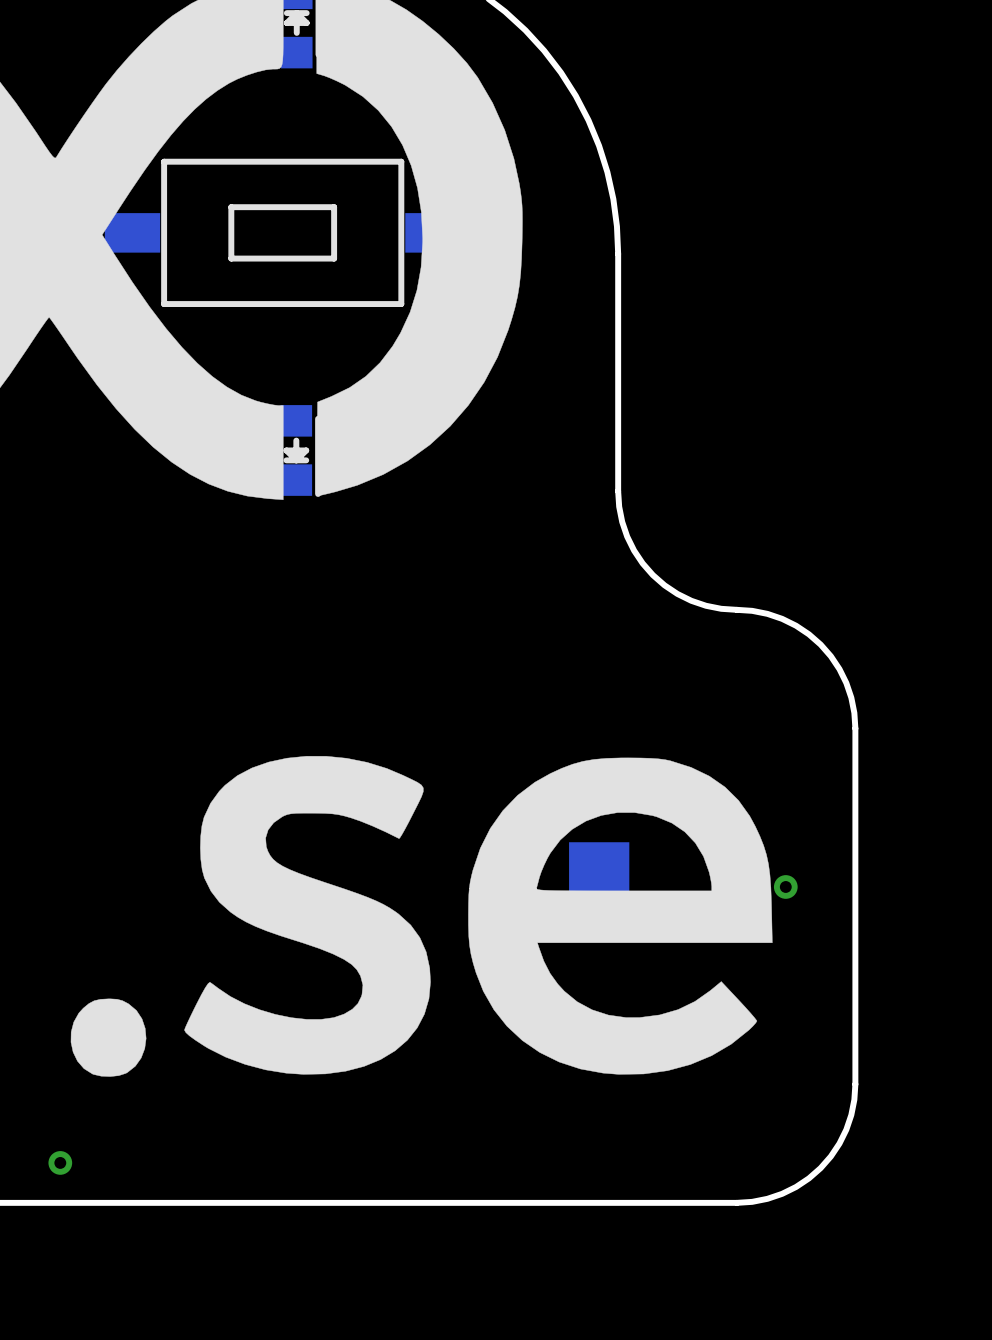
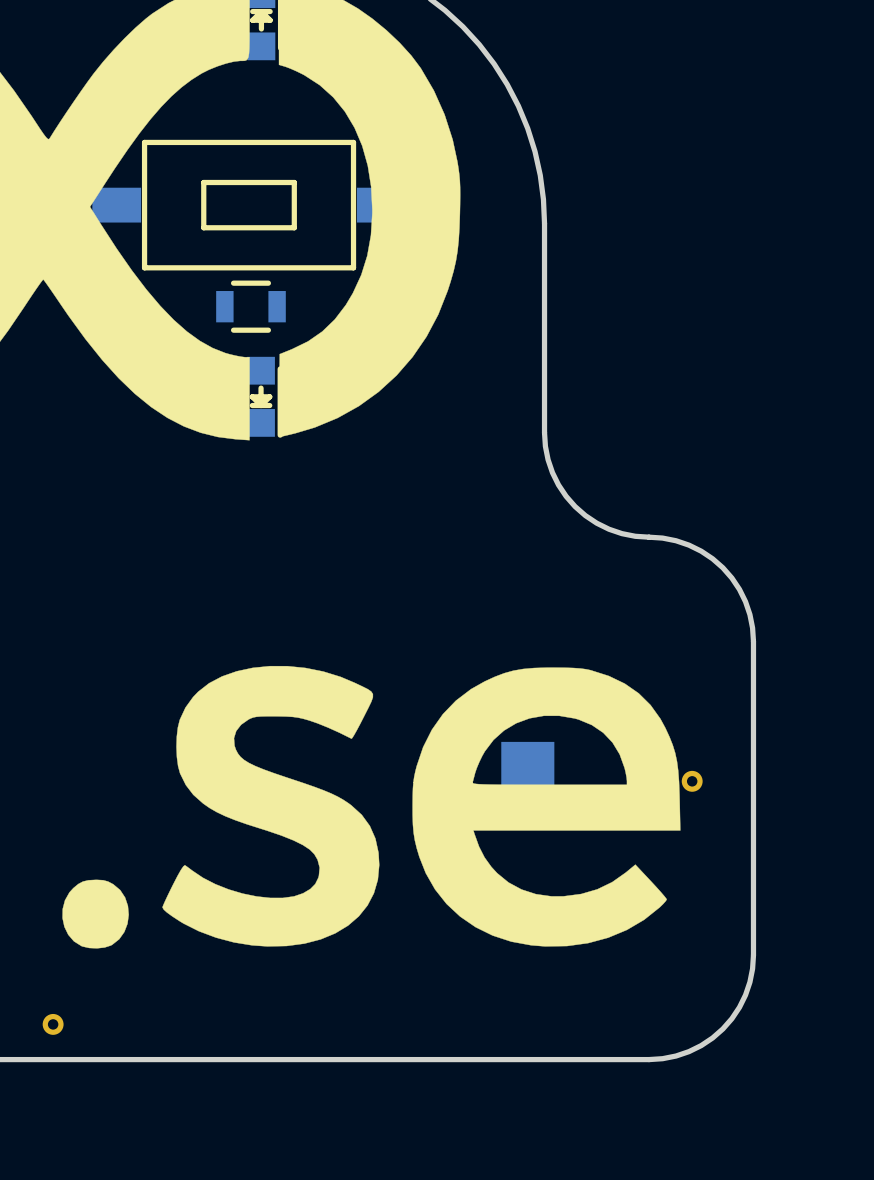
part: none -> (250, 306)

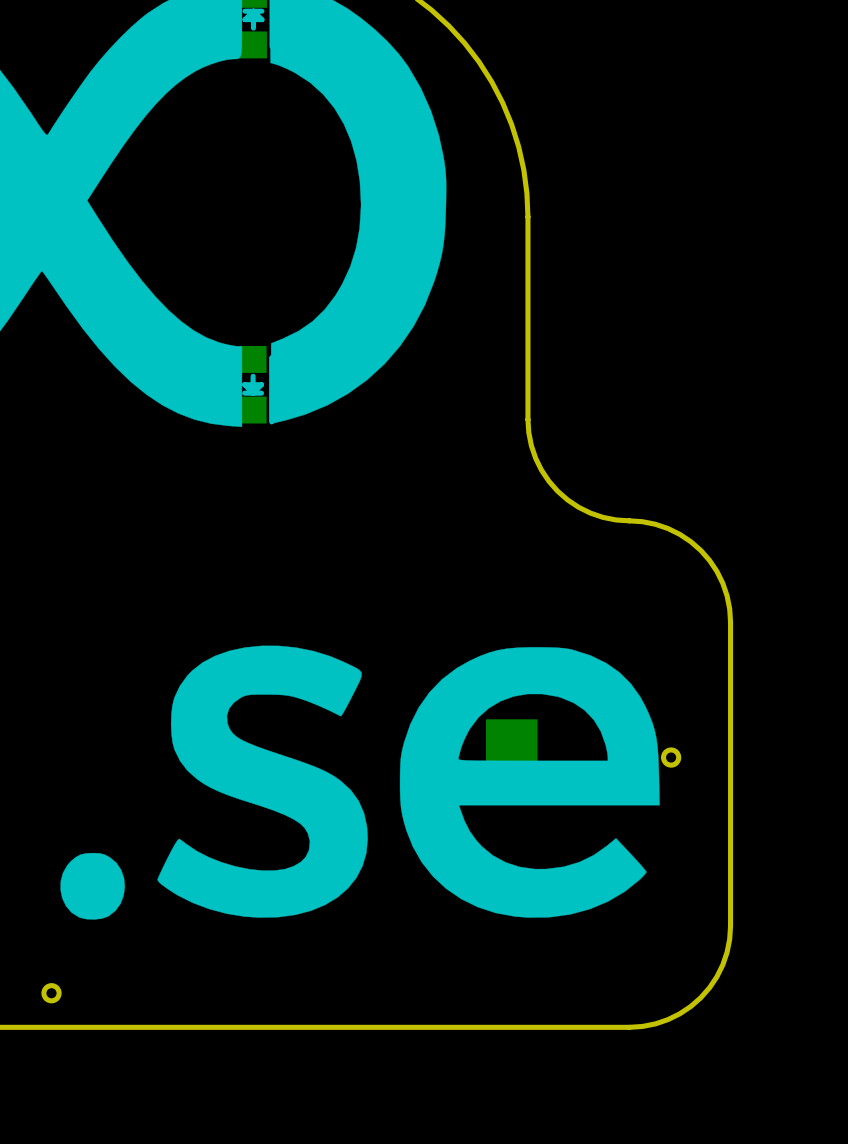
part: (249, 205) -> none
part: (250, 306) -> none

